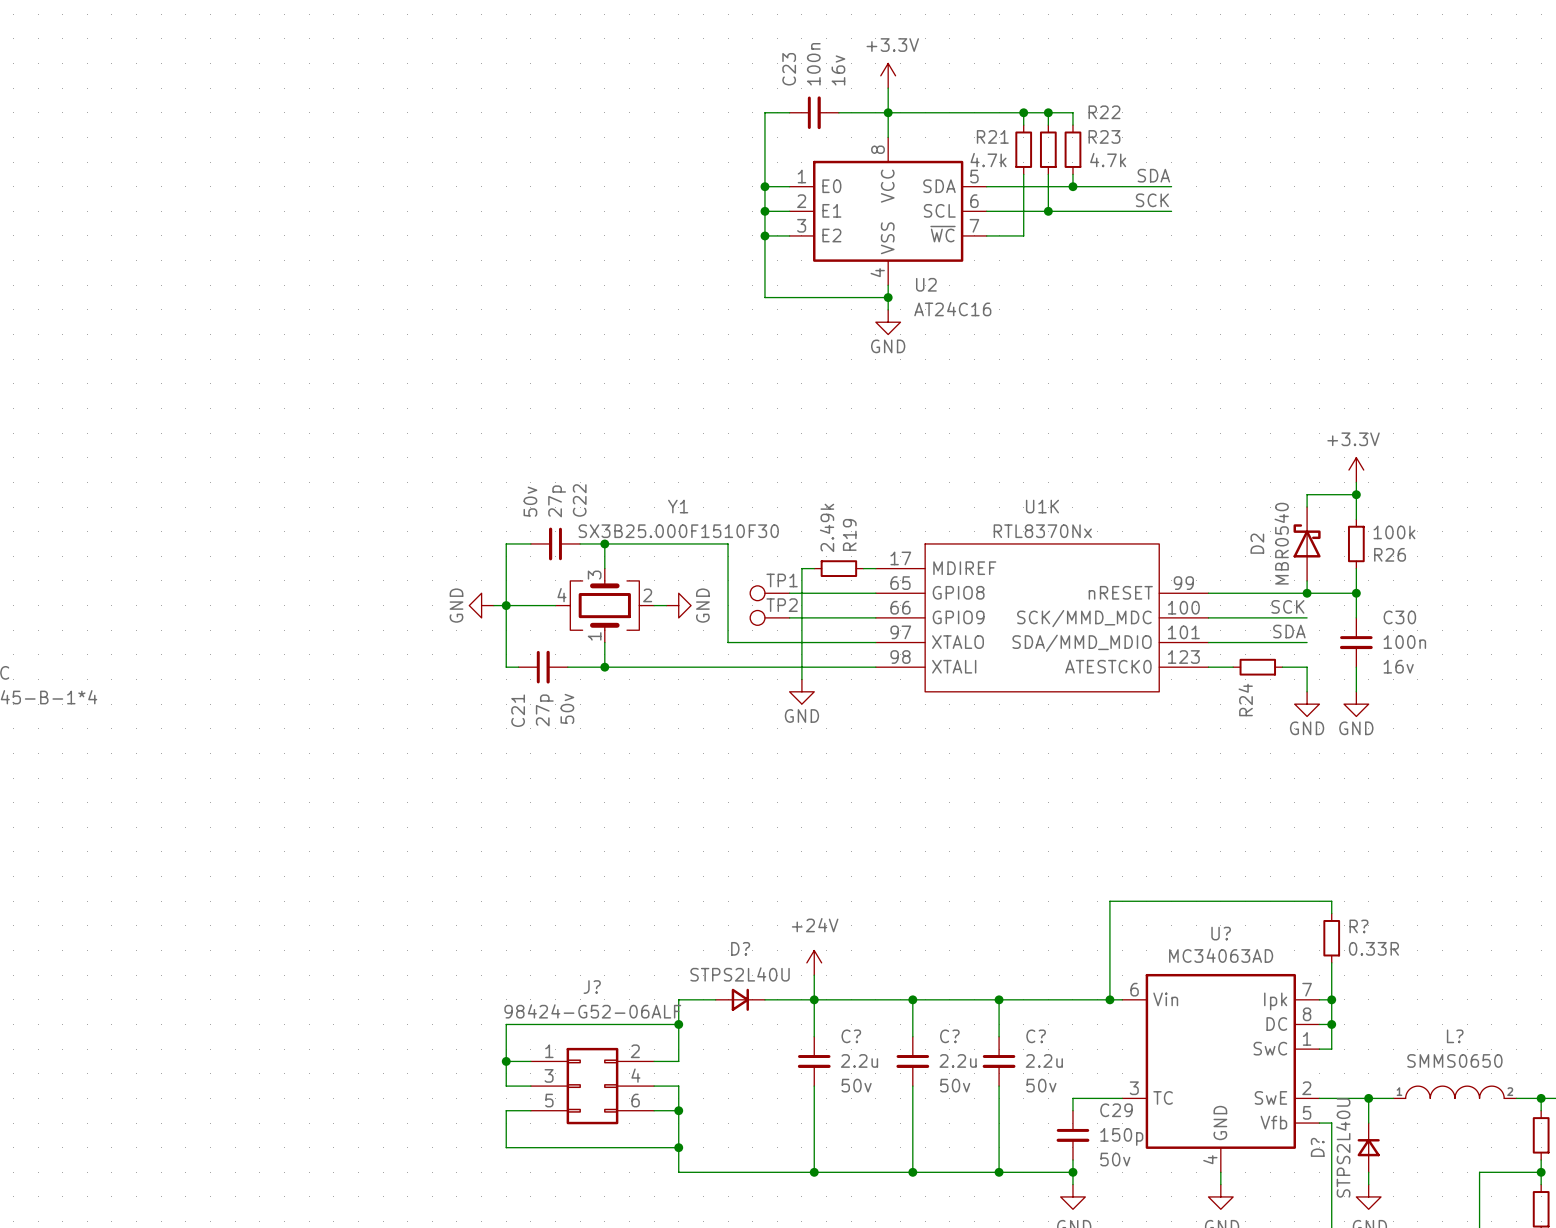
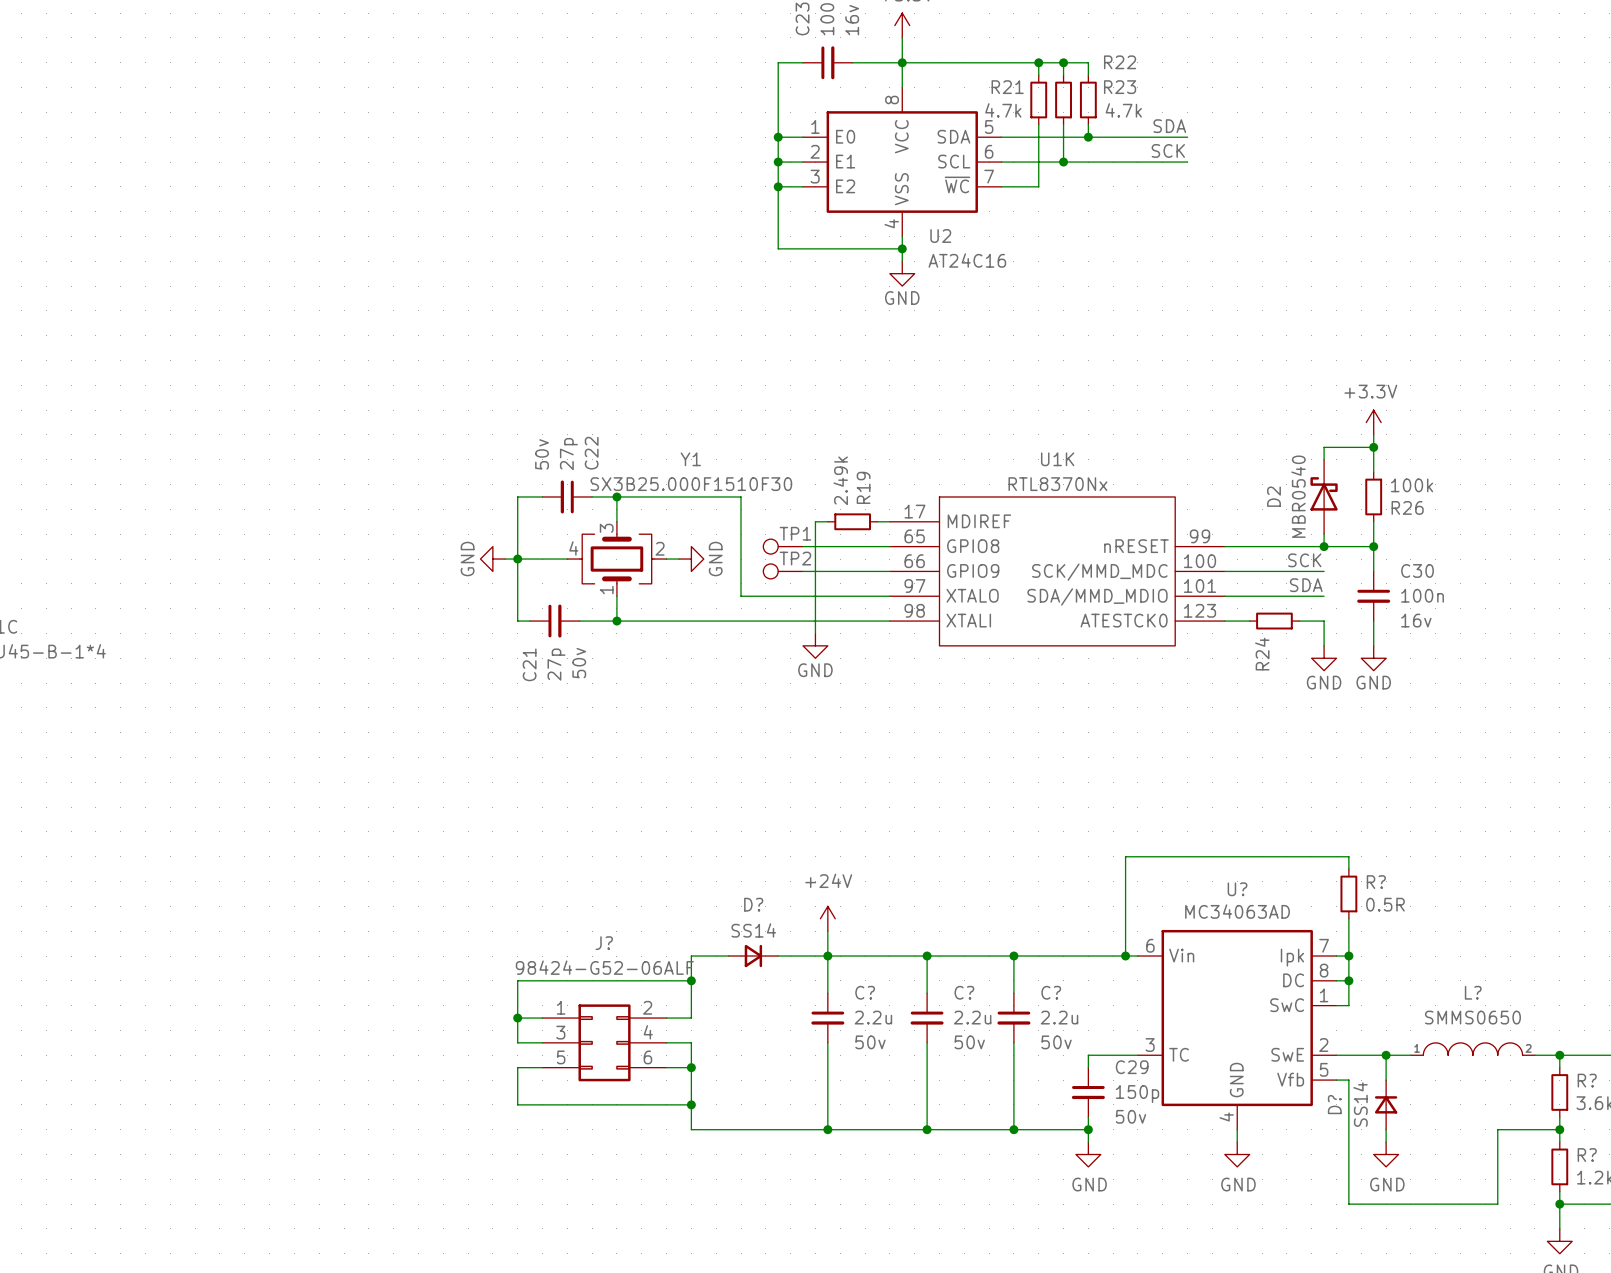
R? value: 0.33R (1373, 948) -> 0.5R (1385, 904)
D? value: STPS2L40U (740, 974) -> SS14 (753, 930)
D? value: STPS2L40U (1343, 1147) -> SS14 (1360, 1104)

